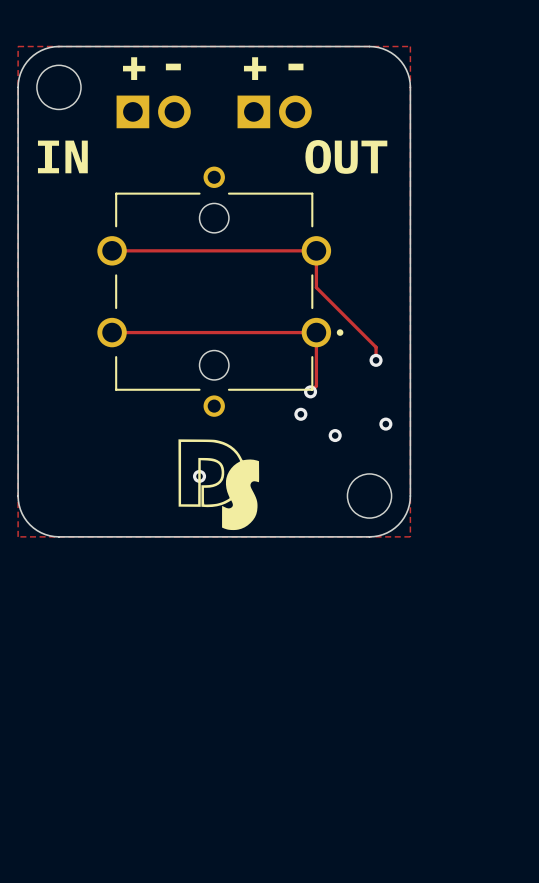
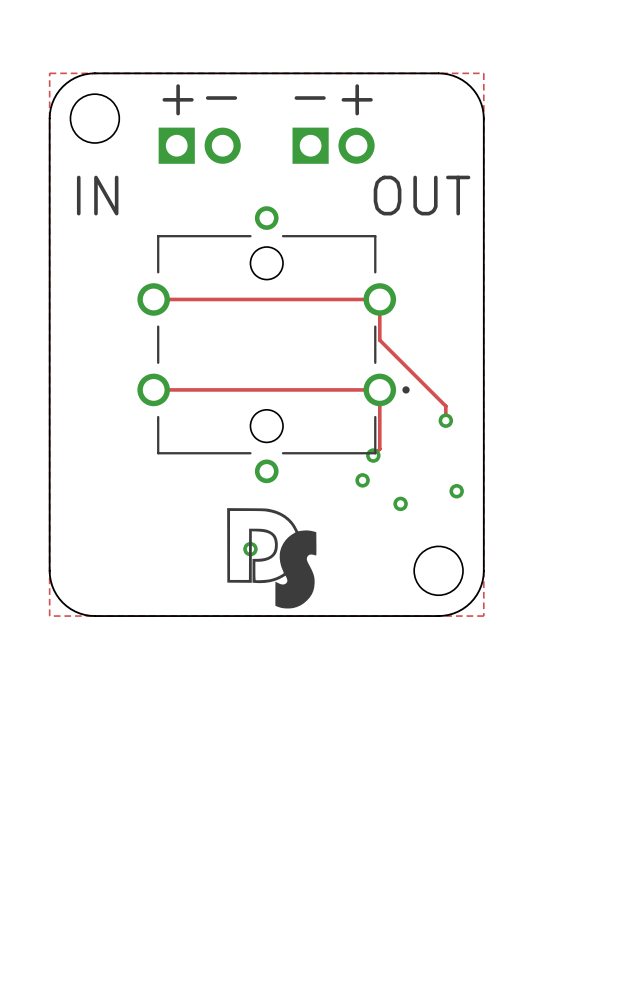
text: - (295, 66) -> + (357, 99)
text: + (255, 68) -> - (310, 98)

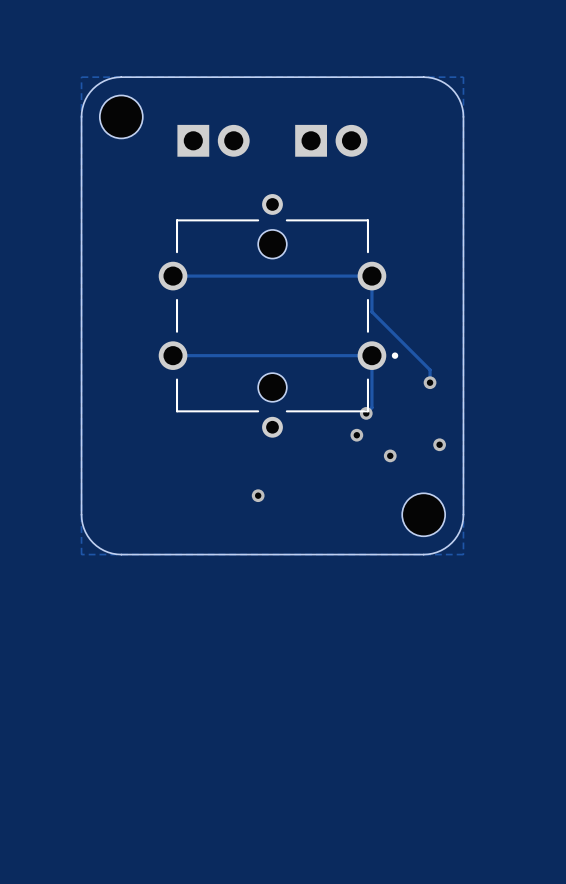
text: - (221, 98) -> none
text: - (310, 98) -> none
text: + (178, 99) -> none
text: + (357, 99) -> none
text: IN (97, 195) -> none
text: OUT (422, 195) -> none
drawing: [227, 508, 317, 609] -> none

